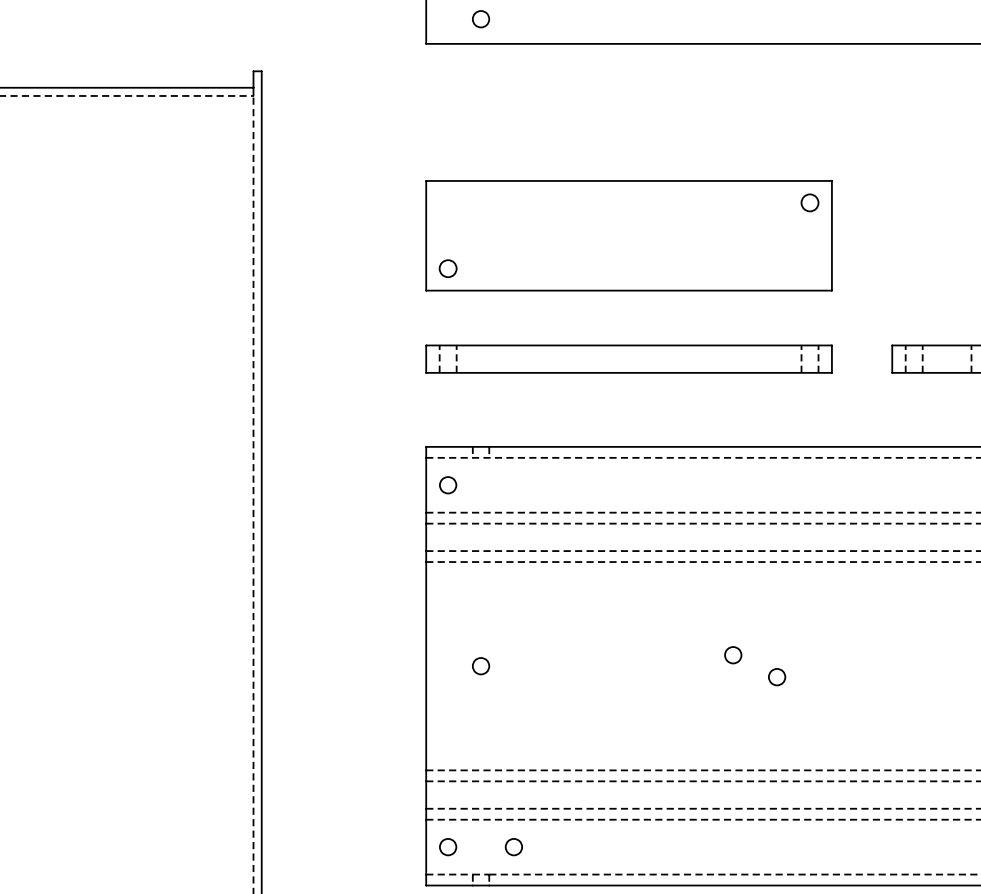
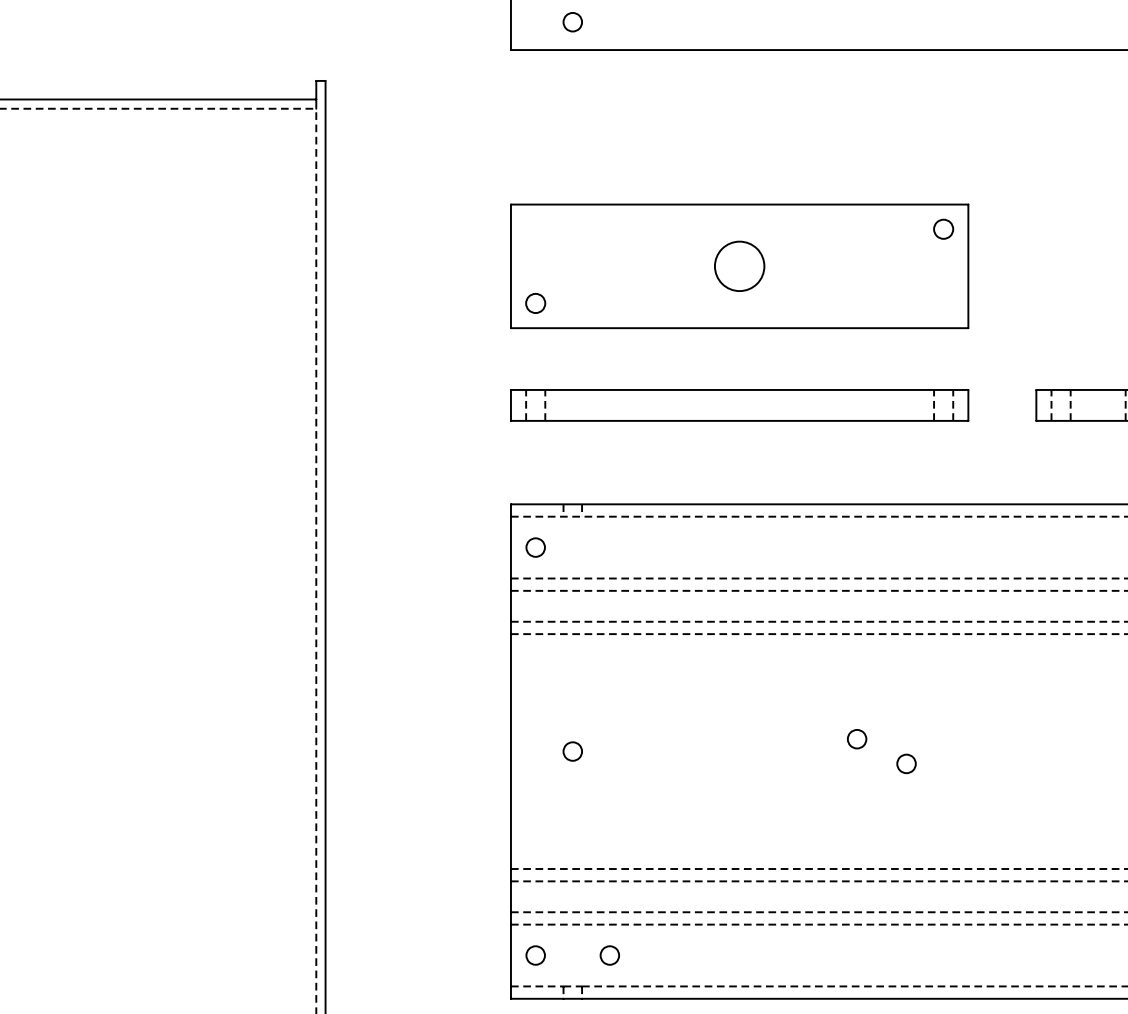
round board edge: none -> [714, 241, 765, 292]

